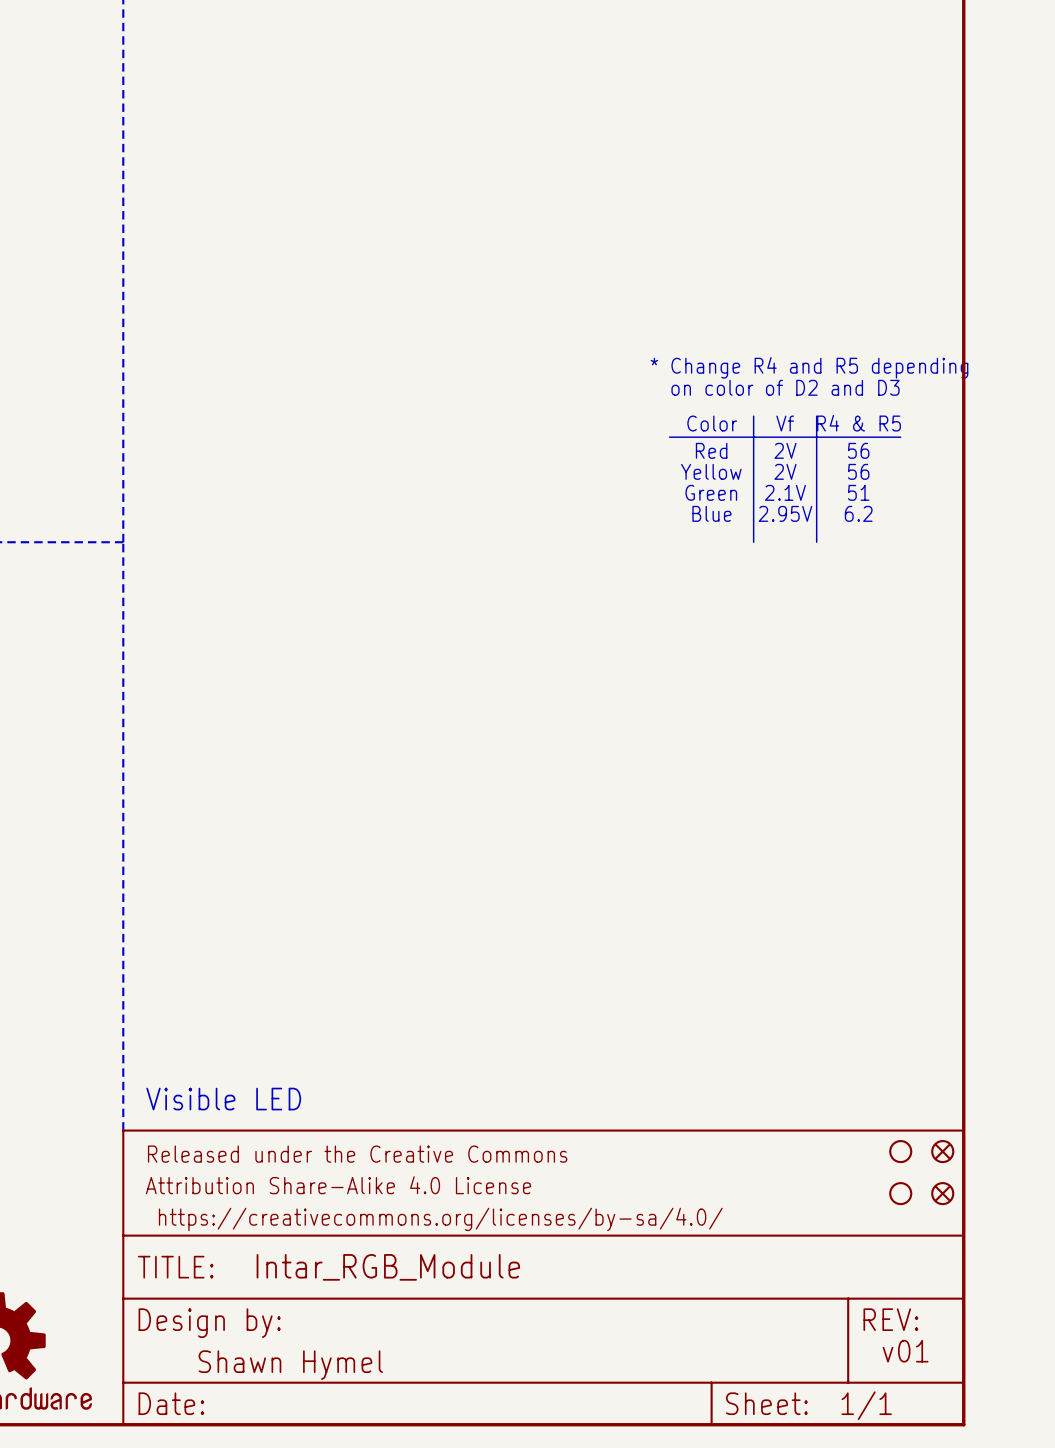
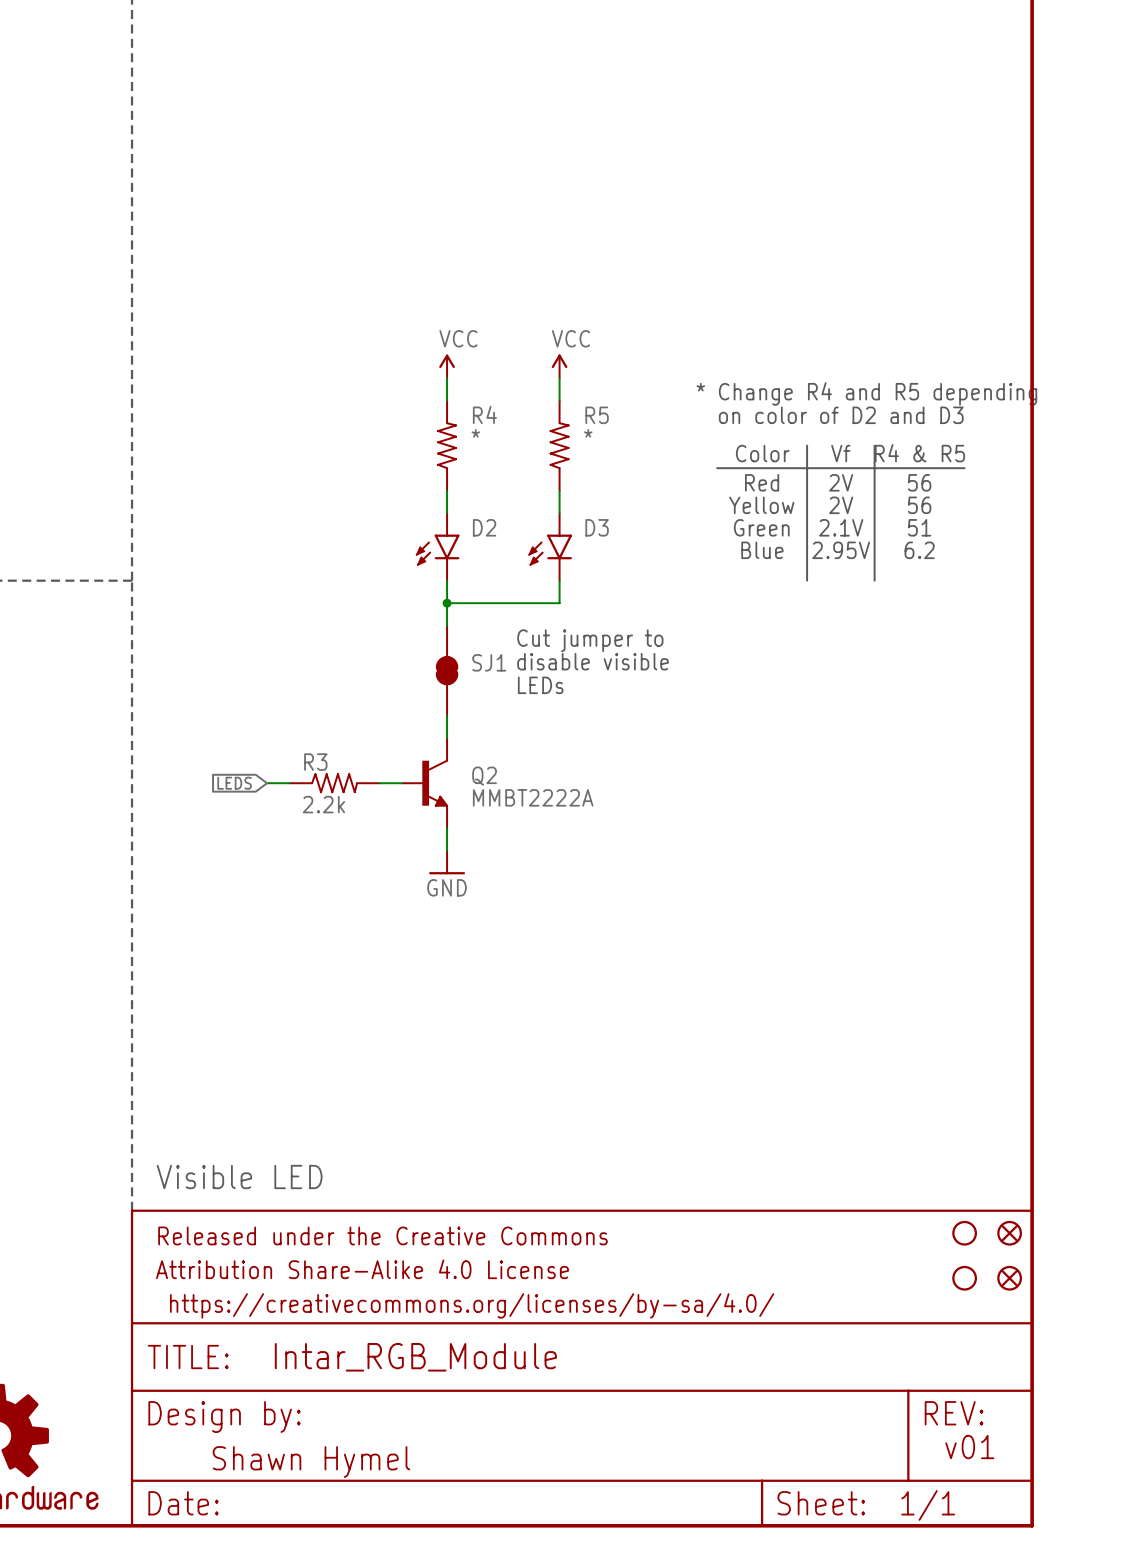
power symbol: none -> VCC (447, 366)
power symbol: none -> VCC (559, 366)
wire: none -> (447, 378) (447, 400)
wire: none -> (559, 378) (559, 400)
R4: none -> * (447, 445)
R5: none -> * (559, 445)
wire: none -> (447, 490) (447, 513)
wire: none -> (559, 490) (559, 513)
D2: none -> (437, 546)
D3: none -> (550, 546)
wire: none -> (447, 580) (447, 625)
wire: none -> (559, 580) (559, 603) (447, 603)
junction: none -> (447, 603)
text: none -> Cut jumper to (590, 640)
text: none -> disable visible (593, 661)
SJ1: none -> (447, 670)
text: none -> LEDs (540, 685)
wire: none -> (447, 715) (447, 738)
global label: none -> LEDS (234, 783)
wire: none -> (267, 783) (289, 783)
R3: none -> 2.2k (334, 783)
wire: none -> (379, 783) (402, 783)
Q2: none -> MMBT2222A (424, 783)
wire: none -> (447, 828) (447, 850)
power symbol: none -> GND (447, 862)

